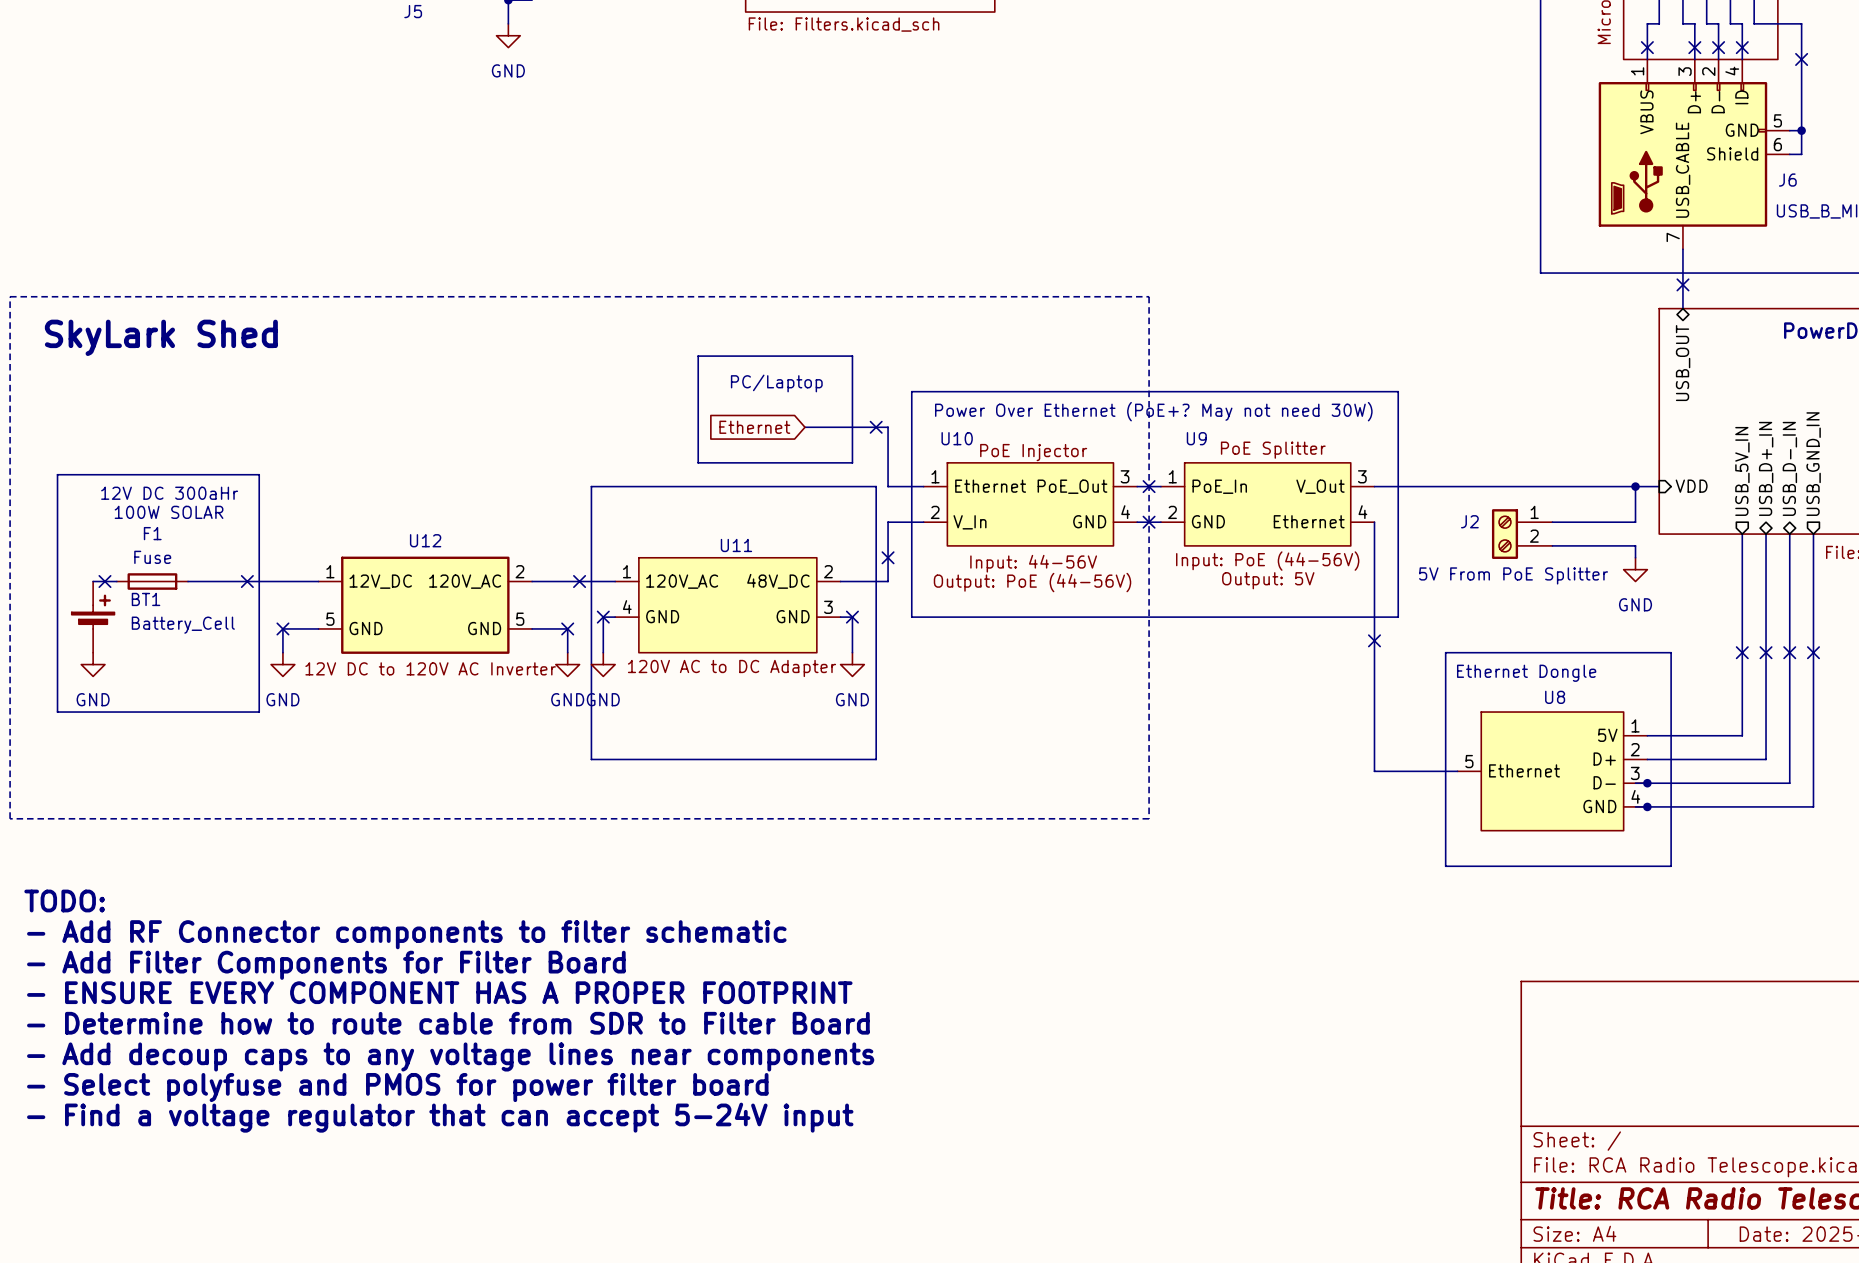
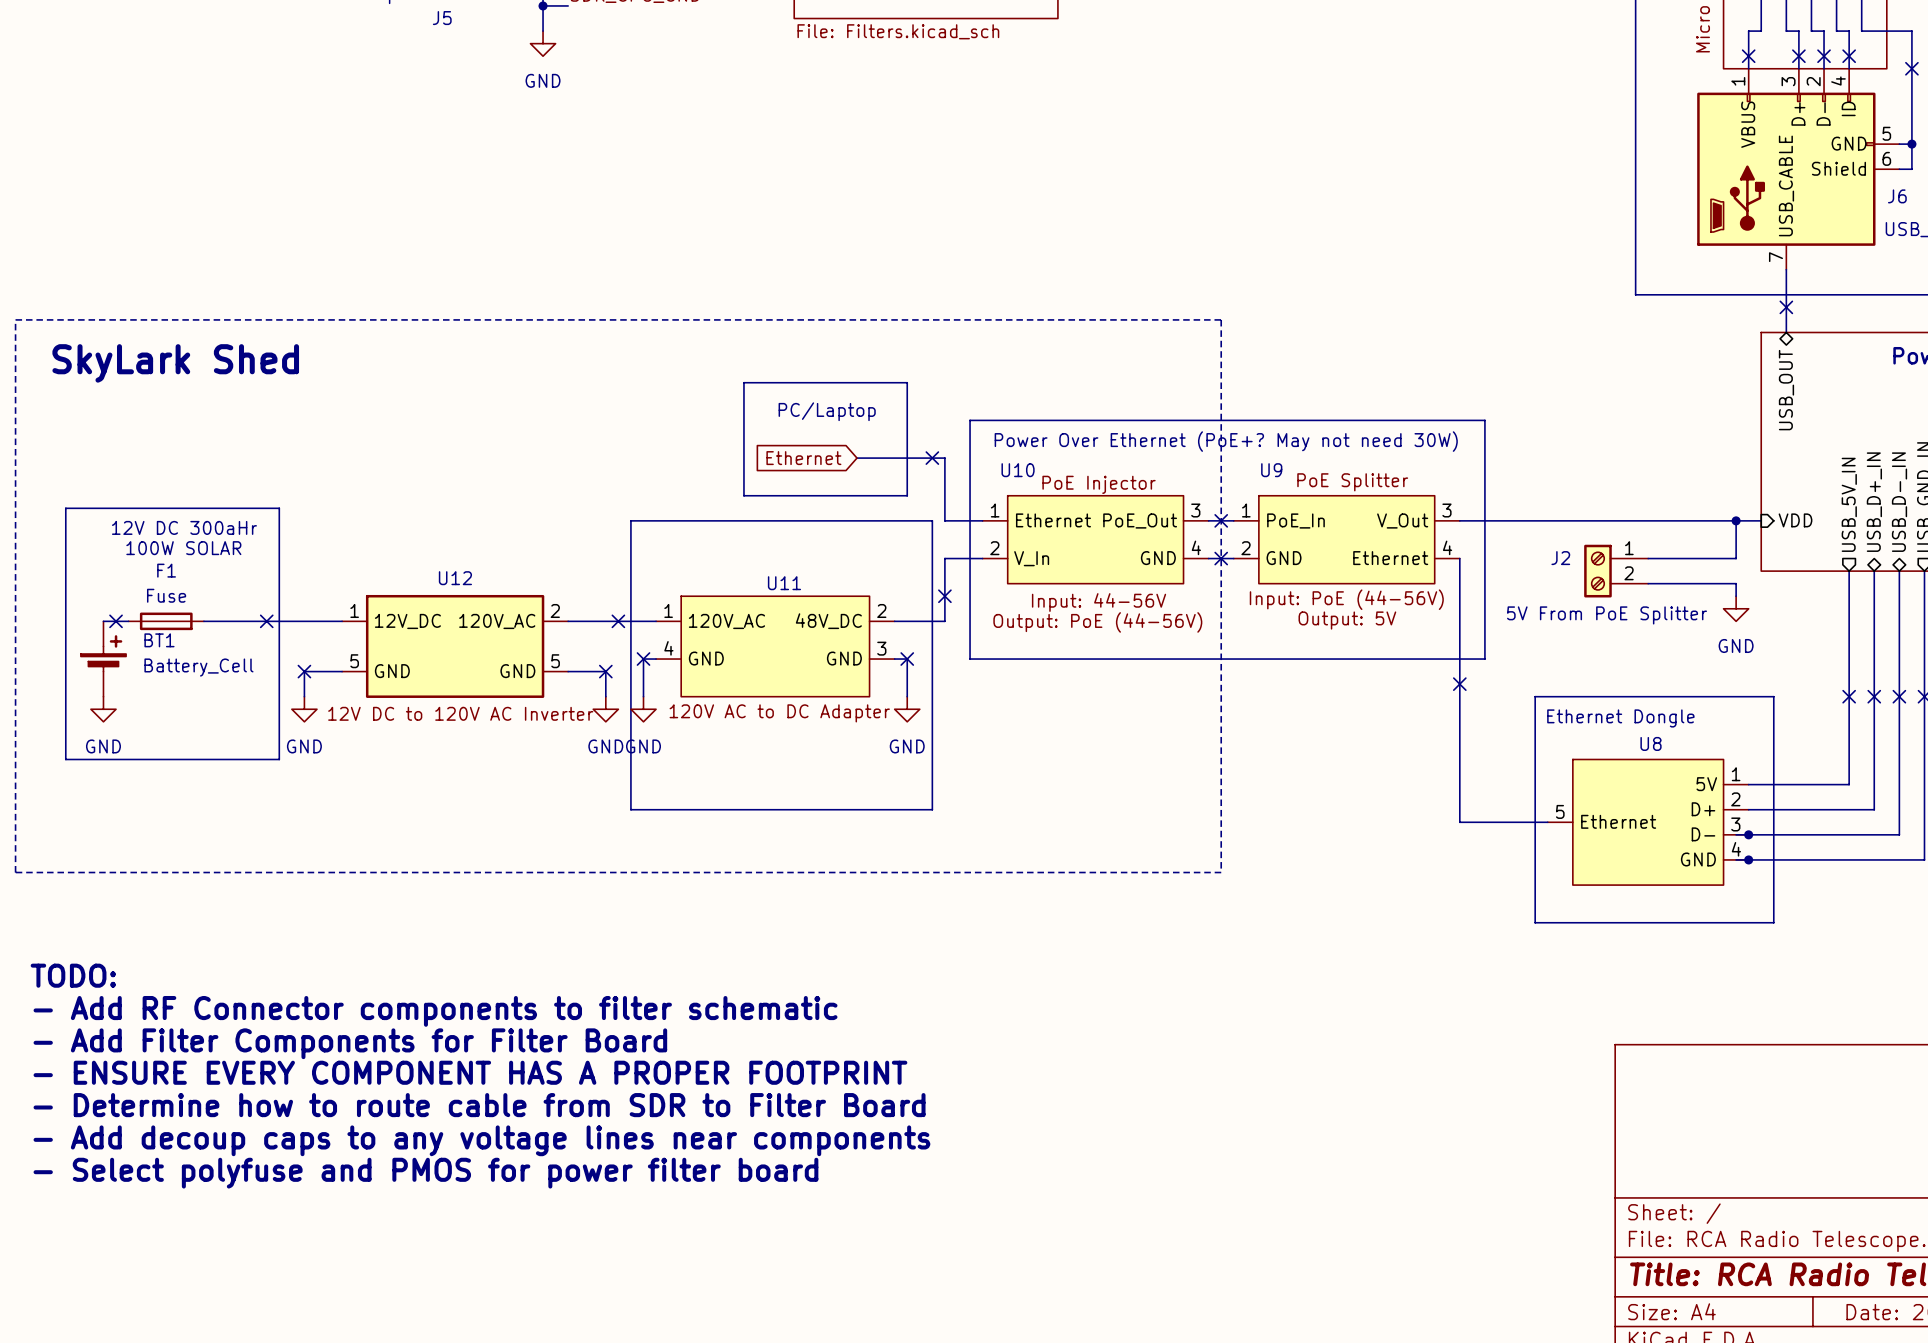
text position: TODO: (64, 900) -> TODO: (73, 975)
text position: - Add RF Connector components to filter schematic (406, 934) -> - Add RF Connector components to filter schematic (435, 1011)
text position: - Add Filter Components for Filter Board (326, 965) -> - Add Filter Components for Filter Board (350, 1043)
text position: - ENSURE EVERY COMPONENT HAS A PROPER FOOTPRINT (439, 992) -> - ENSURE EVERY COMPONENT HAS A PROPER FOOTPRINT (470, 1072)
text position: - Determine how to route cable from SDR to Filter Board (448, 1023) -> - Determine how to route cable from SDR to Filter Board (479, 1105)
text position: - Add decoup caps to any voltage lines near components (450, 1056) -> - Add decoup caps to any voltage lines near components (481, 1140)
text position: - Select polyfuse and PMOS for power filter board (397, 1087) -> - Select polyfuse and PMOS for power filter board (425, 1173)
text: - Find a voltage regulator that can accept 5-24V input (440, 1117) -> none

